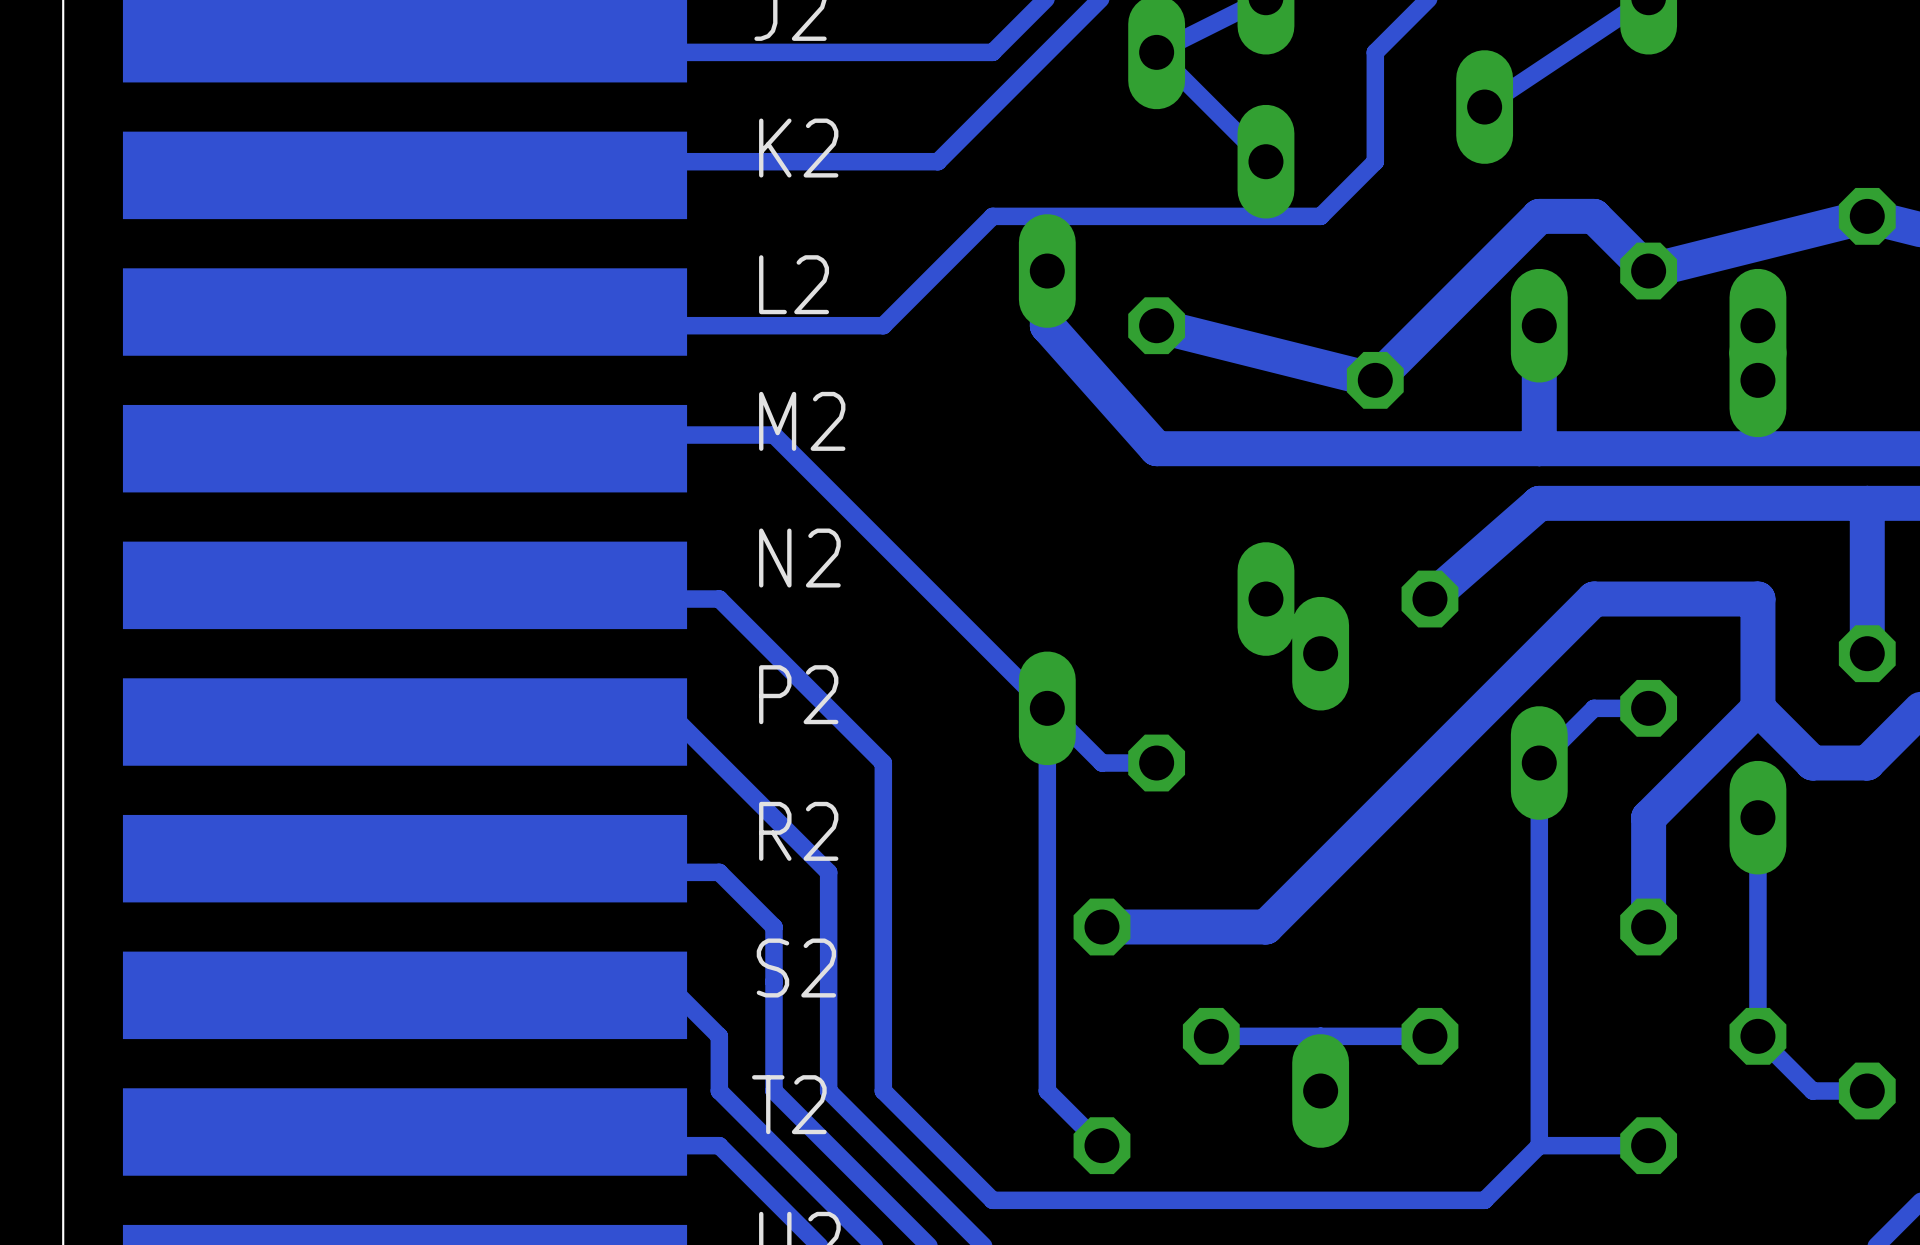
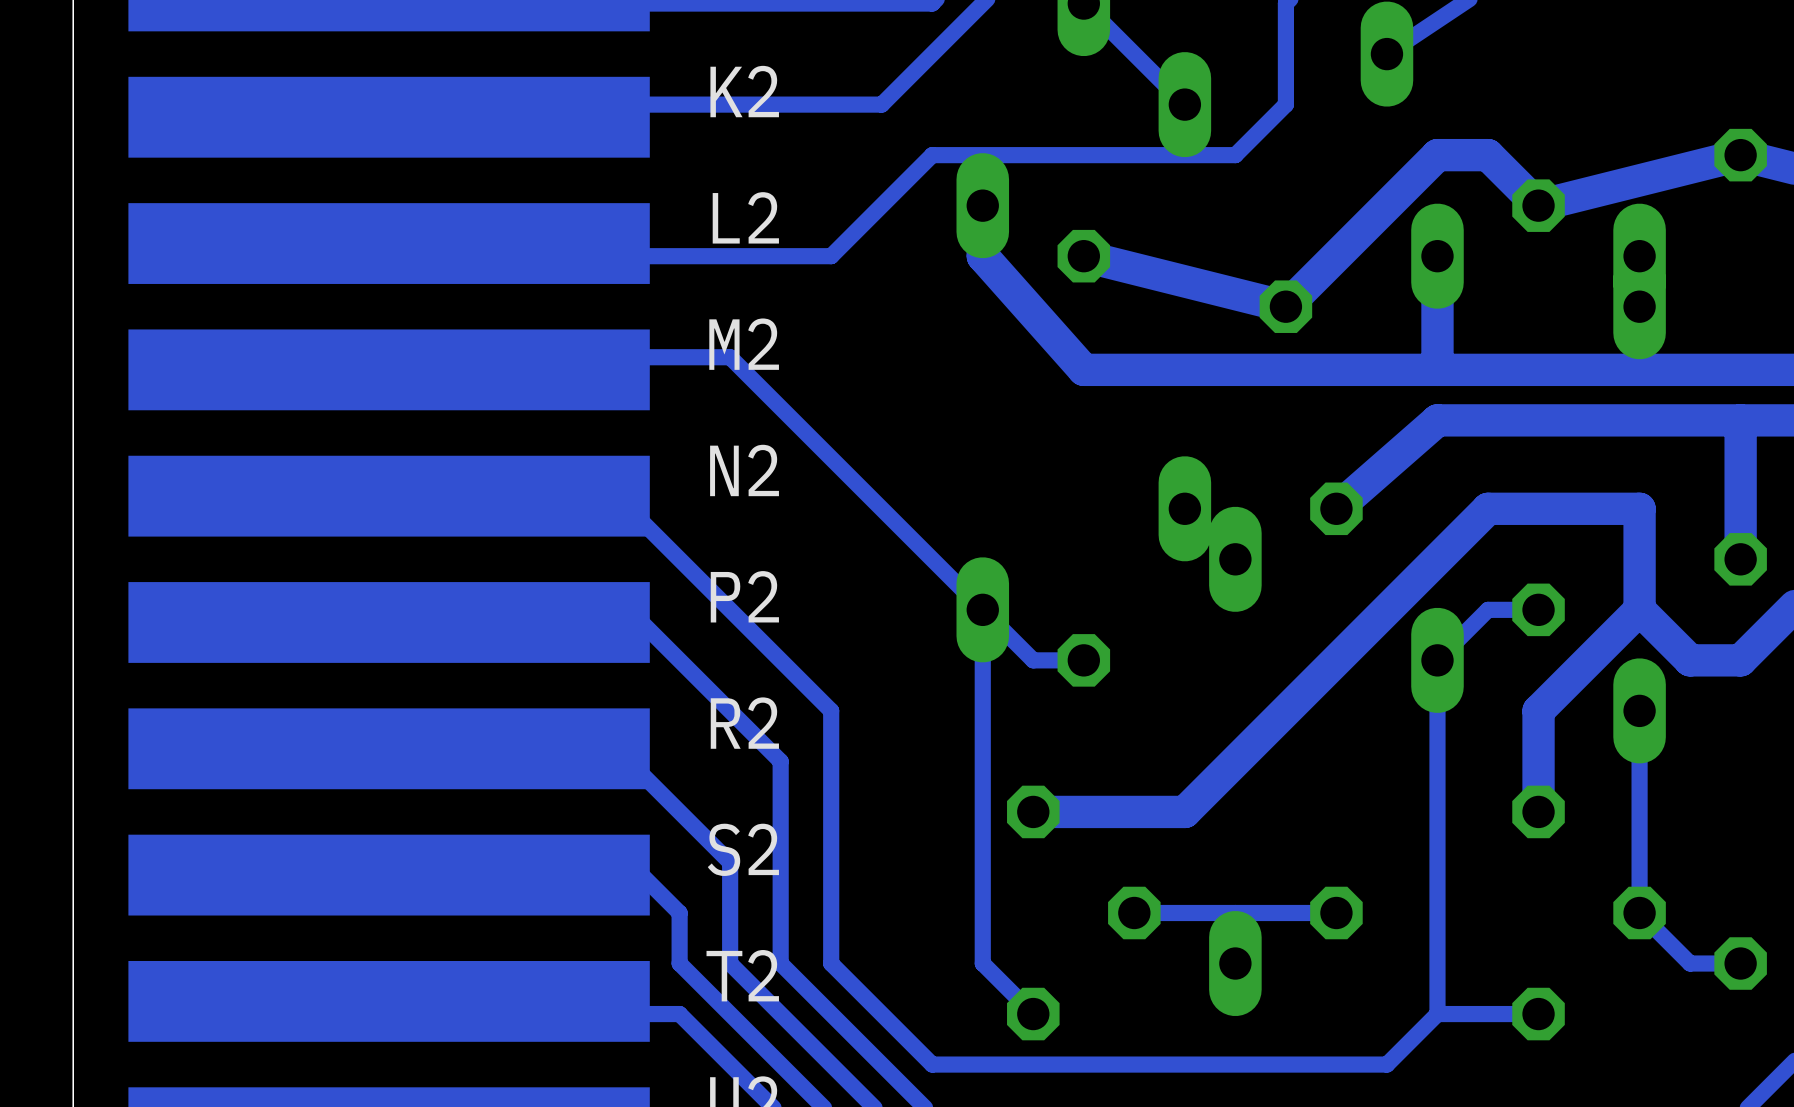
track: (664, 599) (719, 599) (883, 763) (883, 817) -> (629, 508) (831, 710)
track: (664, 872) (719, 872) (773, 927) (773, 981) -> (629, 761) (730, 862)

